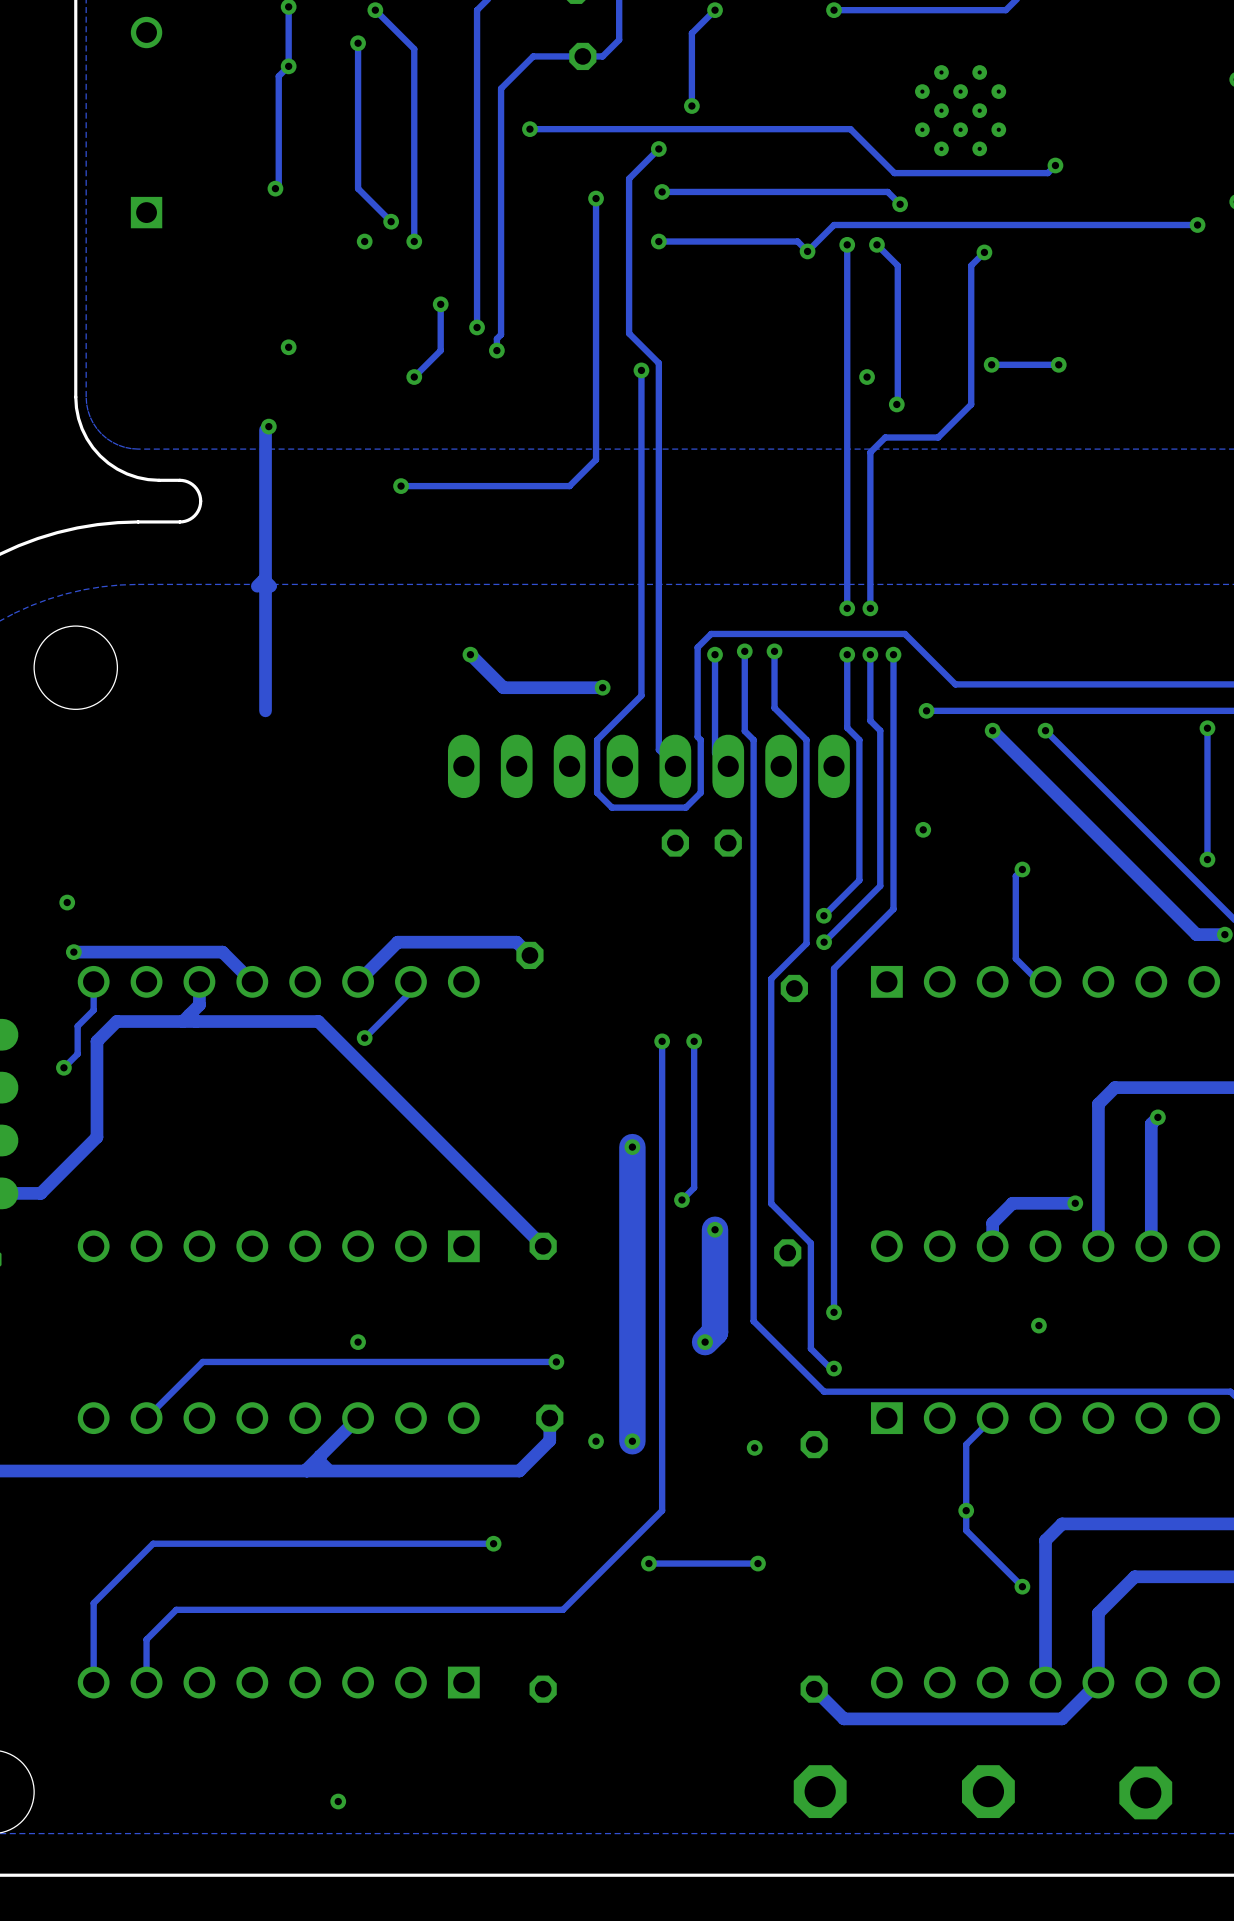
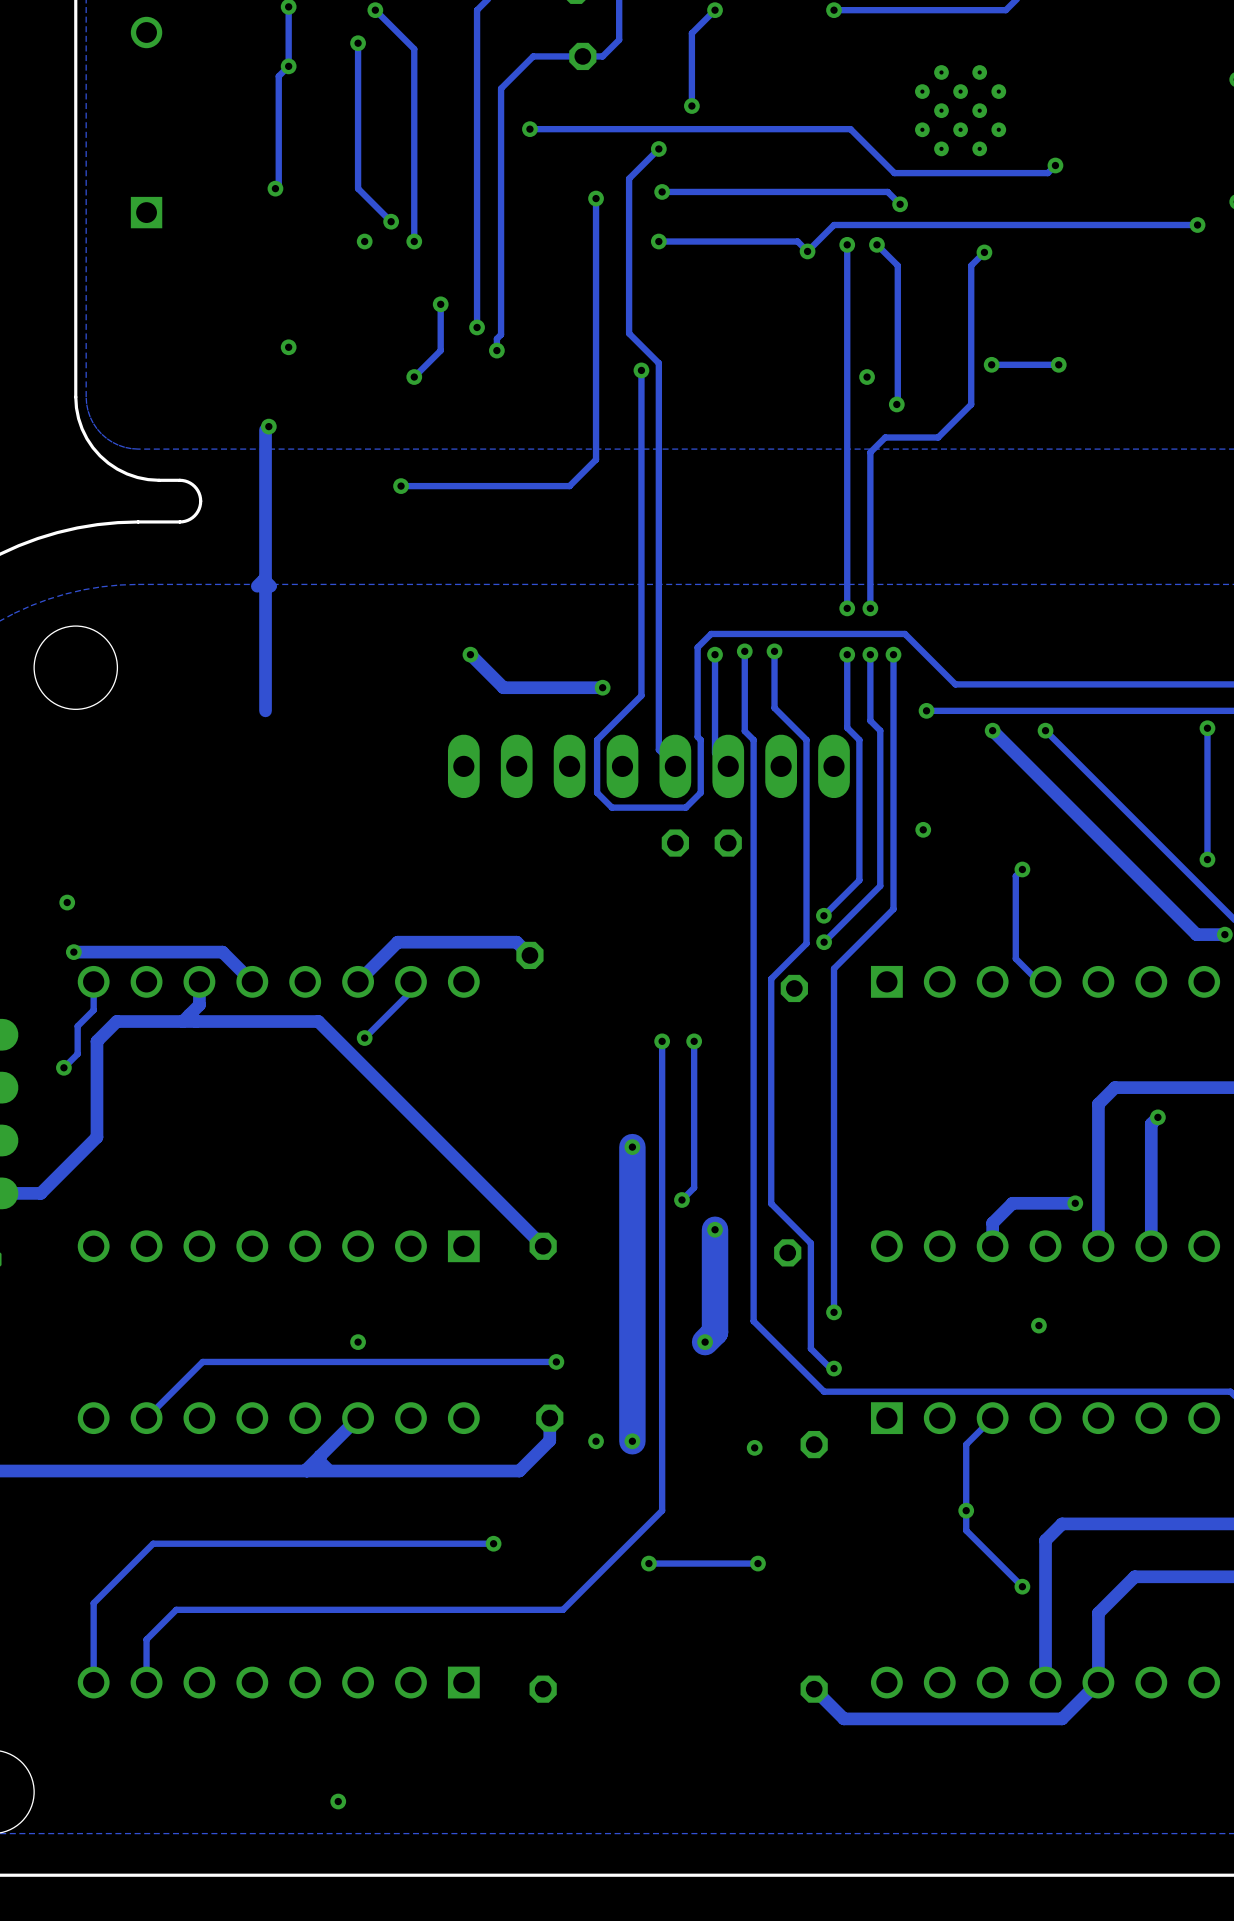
part: (820, 1791) -> none
part: (988, 1791) -> none
part: (1145, 1792) -> none

